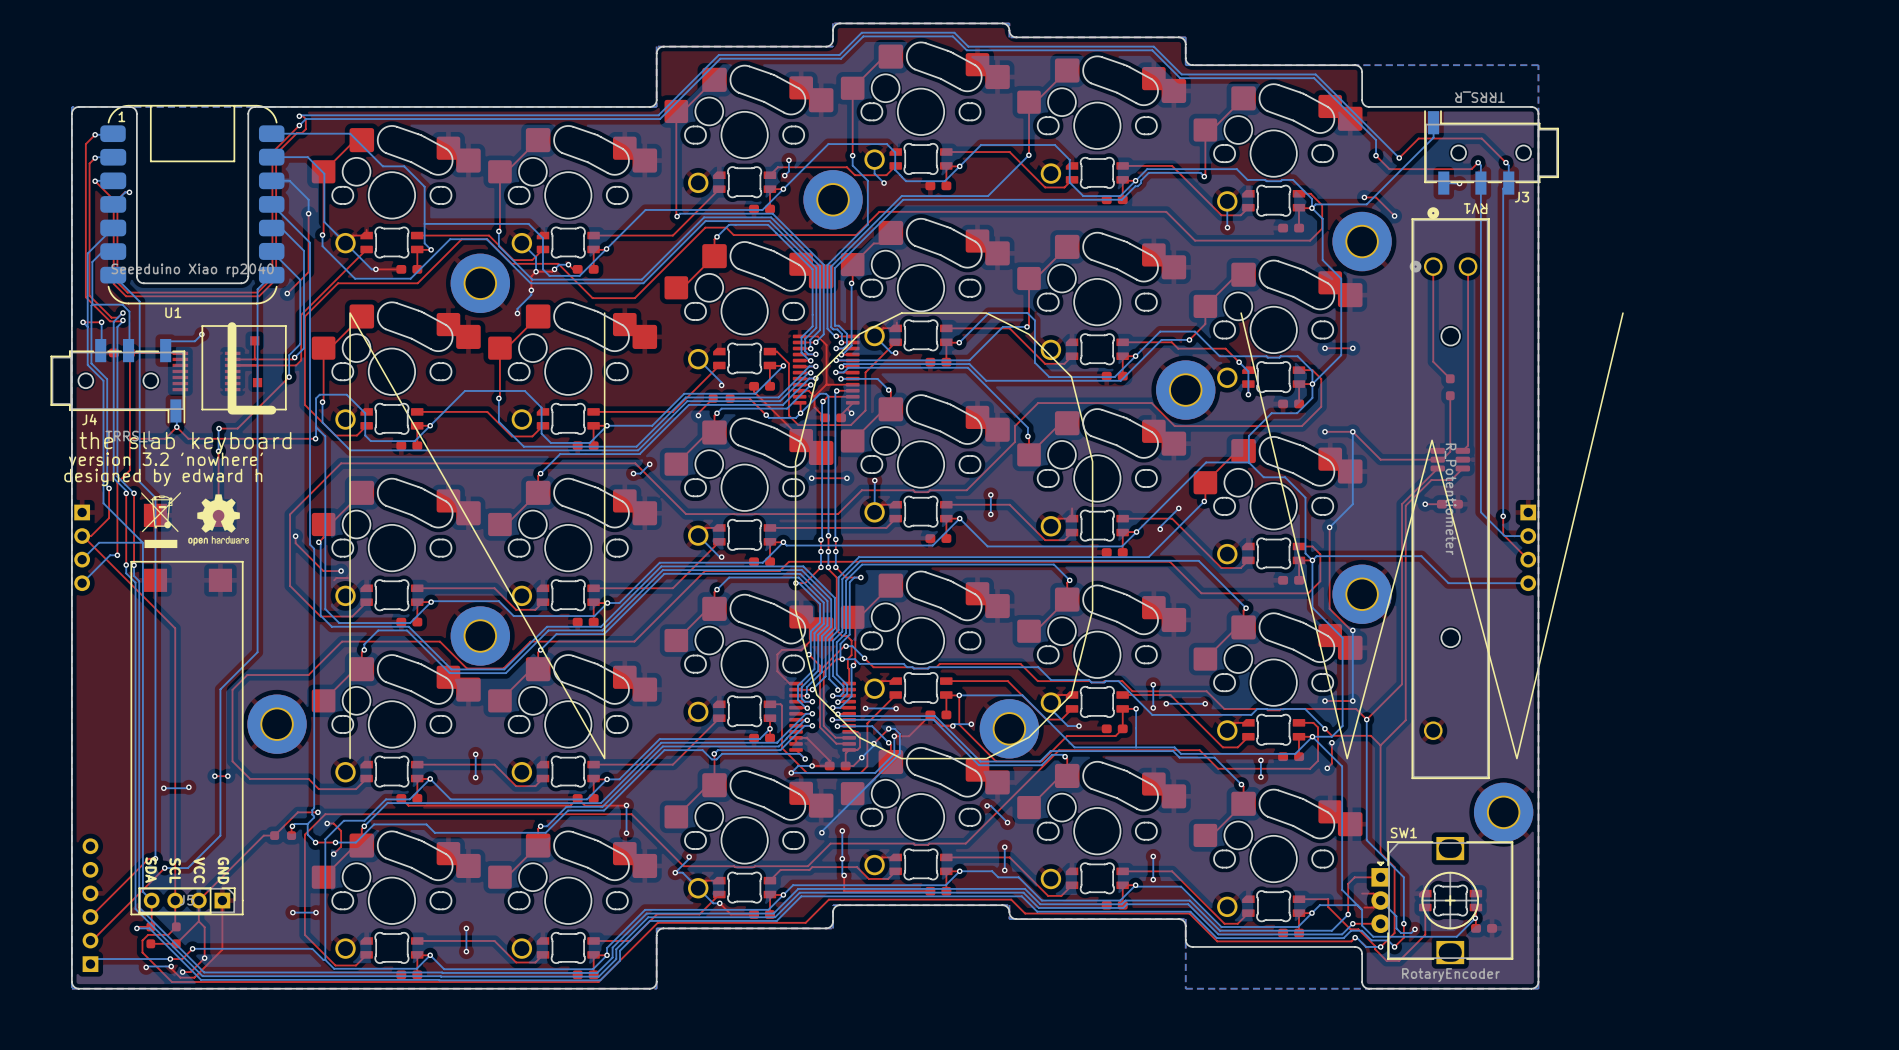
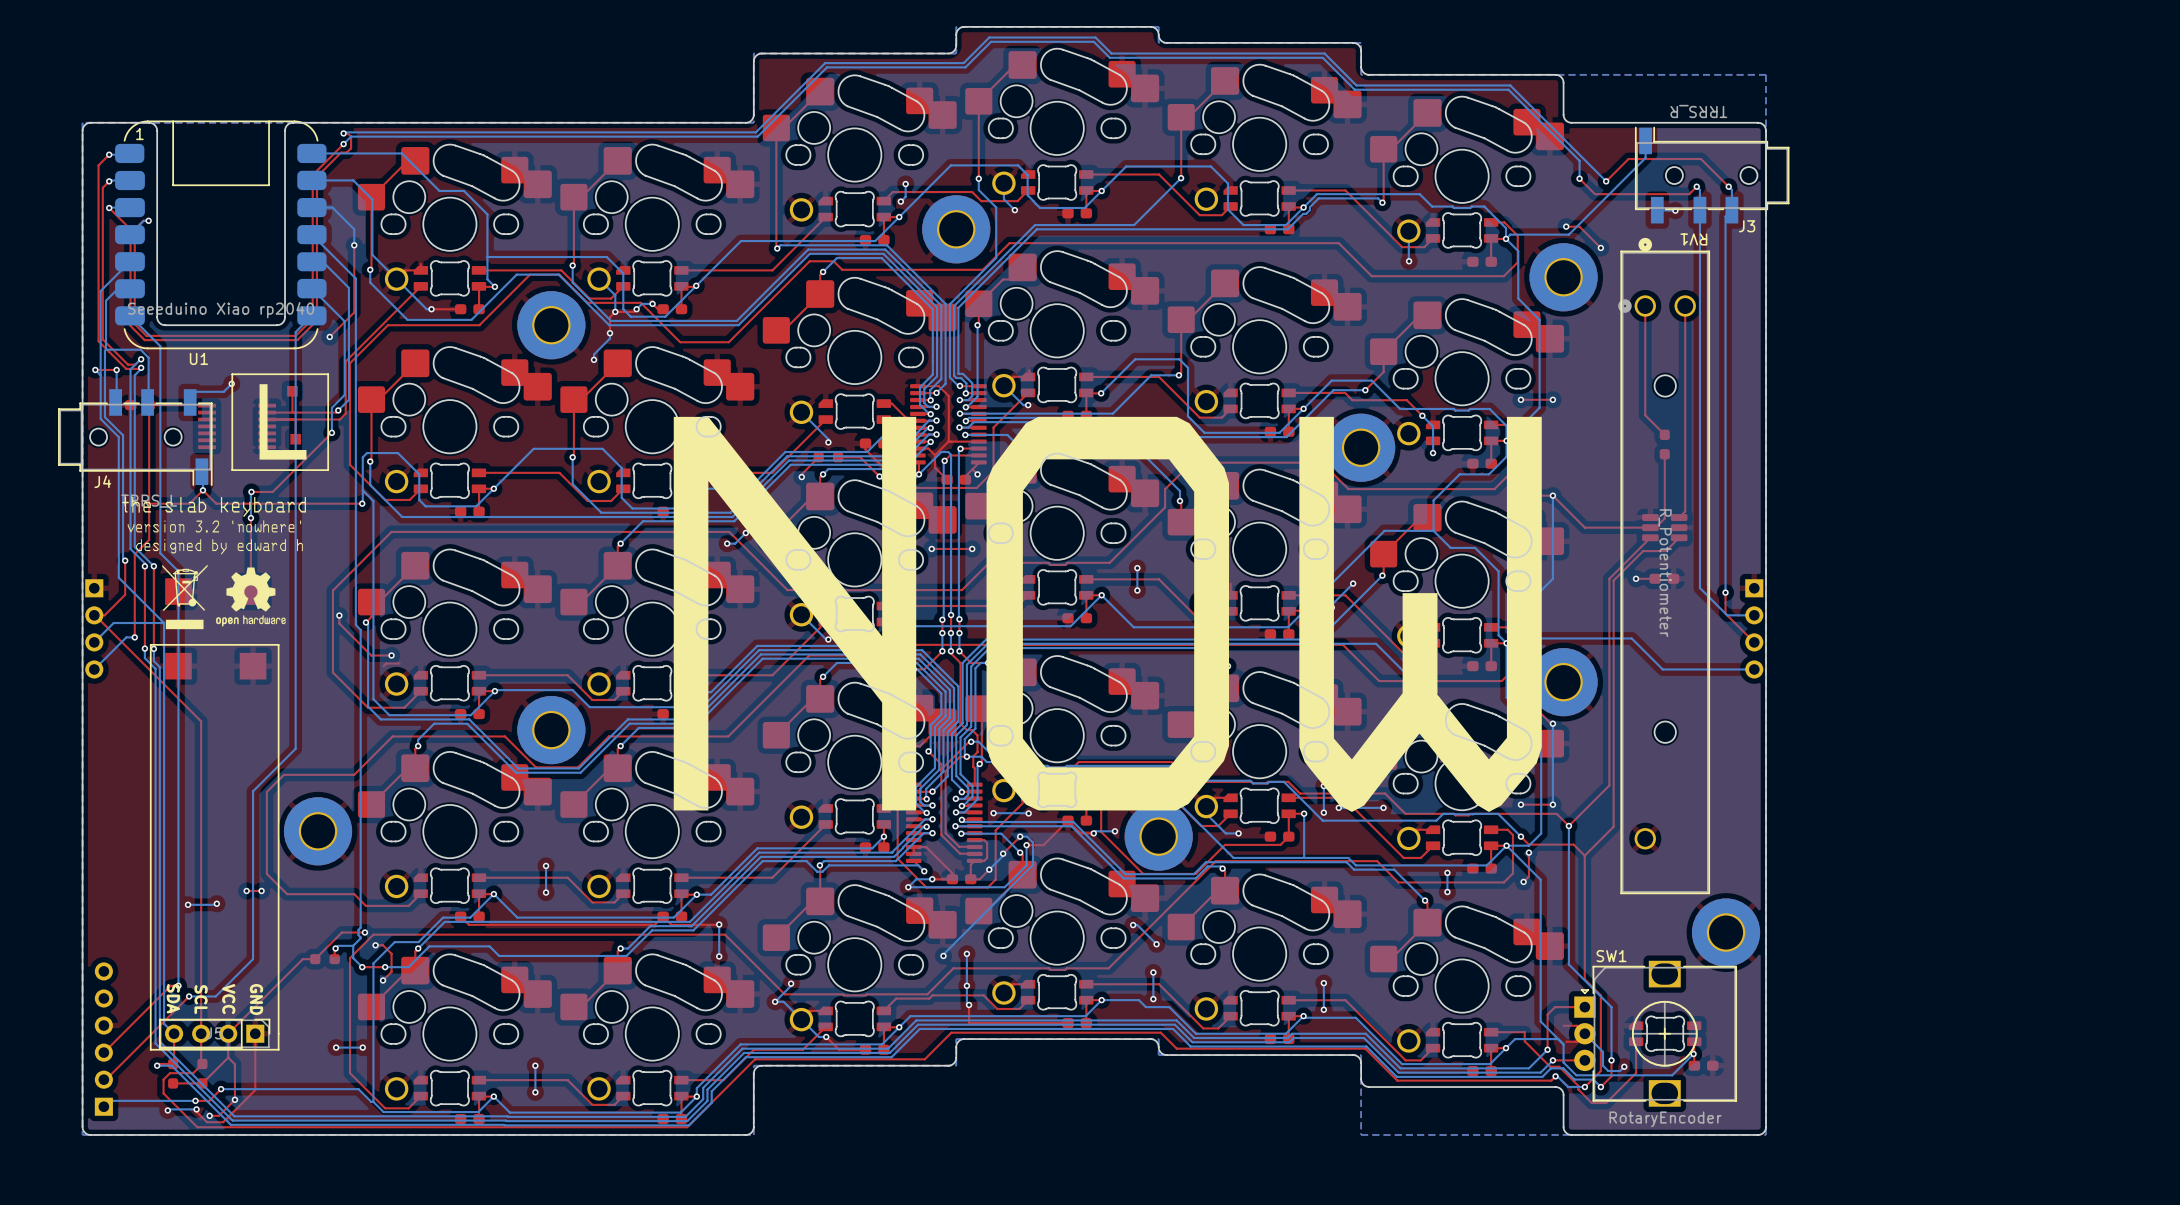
drawing: none -> [259, 384, 307, 460]
drawing: none -> [673, 416, 917, 811]
drawing: none -> [986, 416, 1229, 811]
drawing: none -> [1299, 416, 1542, 812]
text: L (251, 368) -> none
drawing: none -> [122, 496, 306, 555]
text: the slab keyboard (185, 443) -> none
text: version 3.2 'nowhere' (166, 459) -> none
text: designed by edward h (163, 477) -> none
text: NOW (986, 535) -> none

